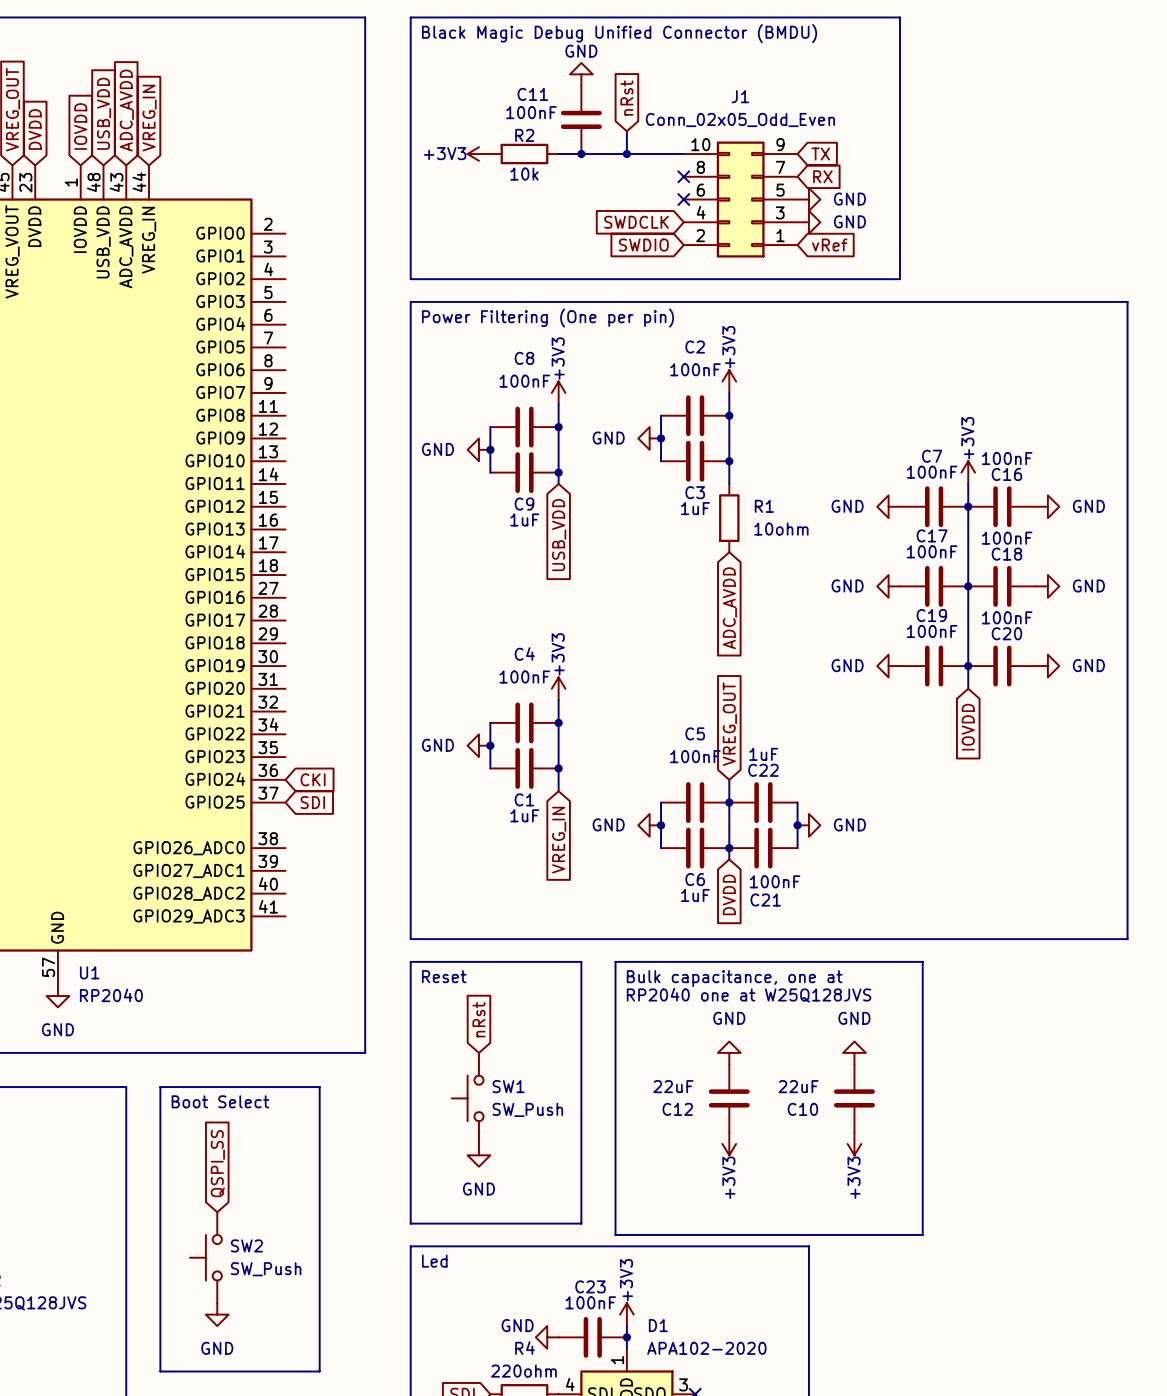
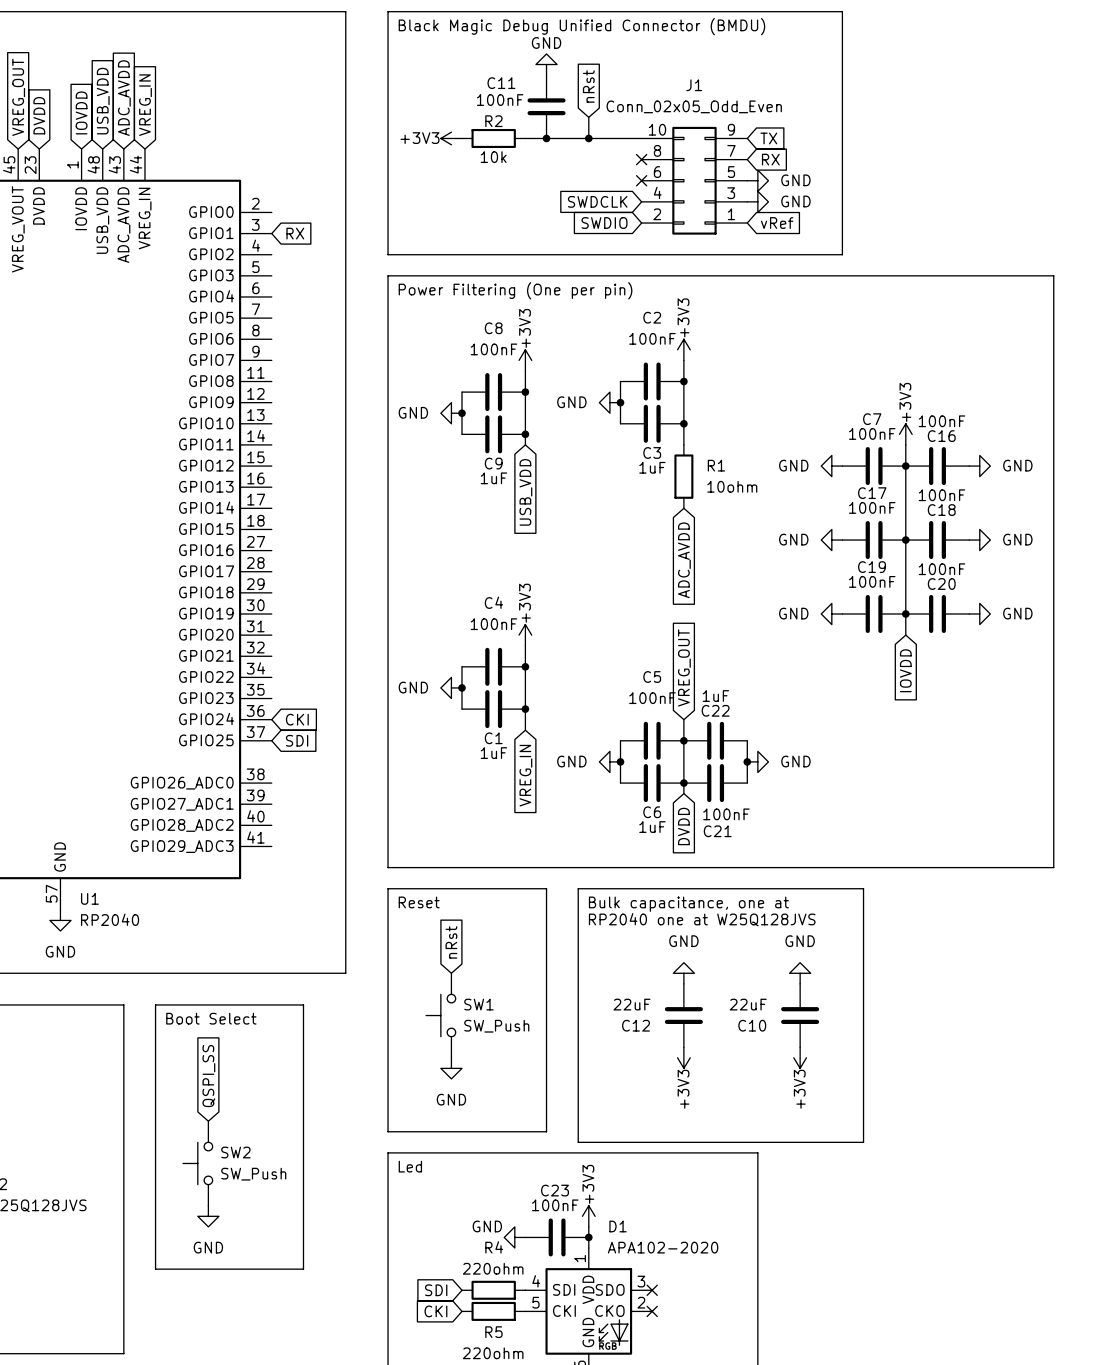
global label: none -> RX (295, 233)

